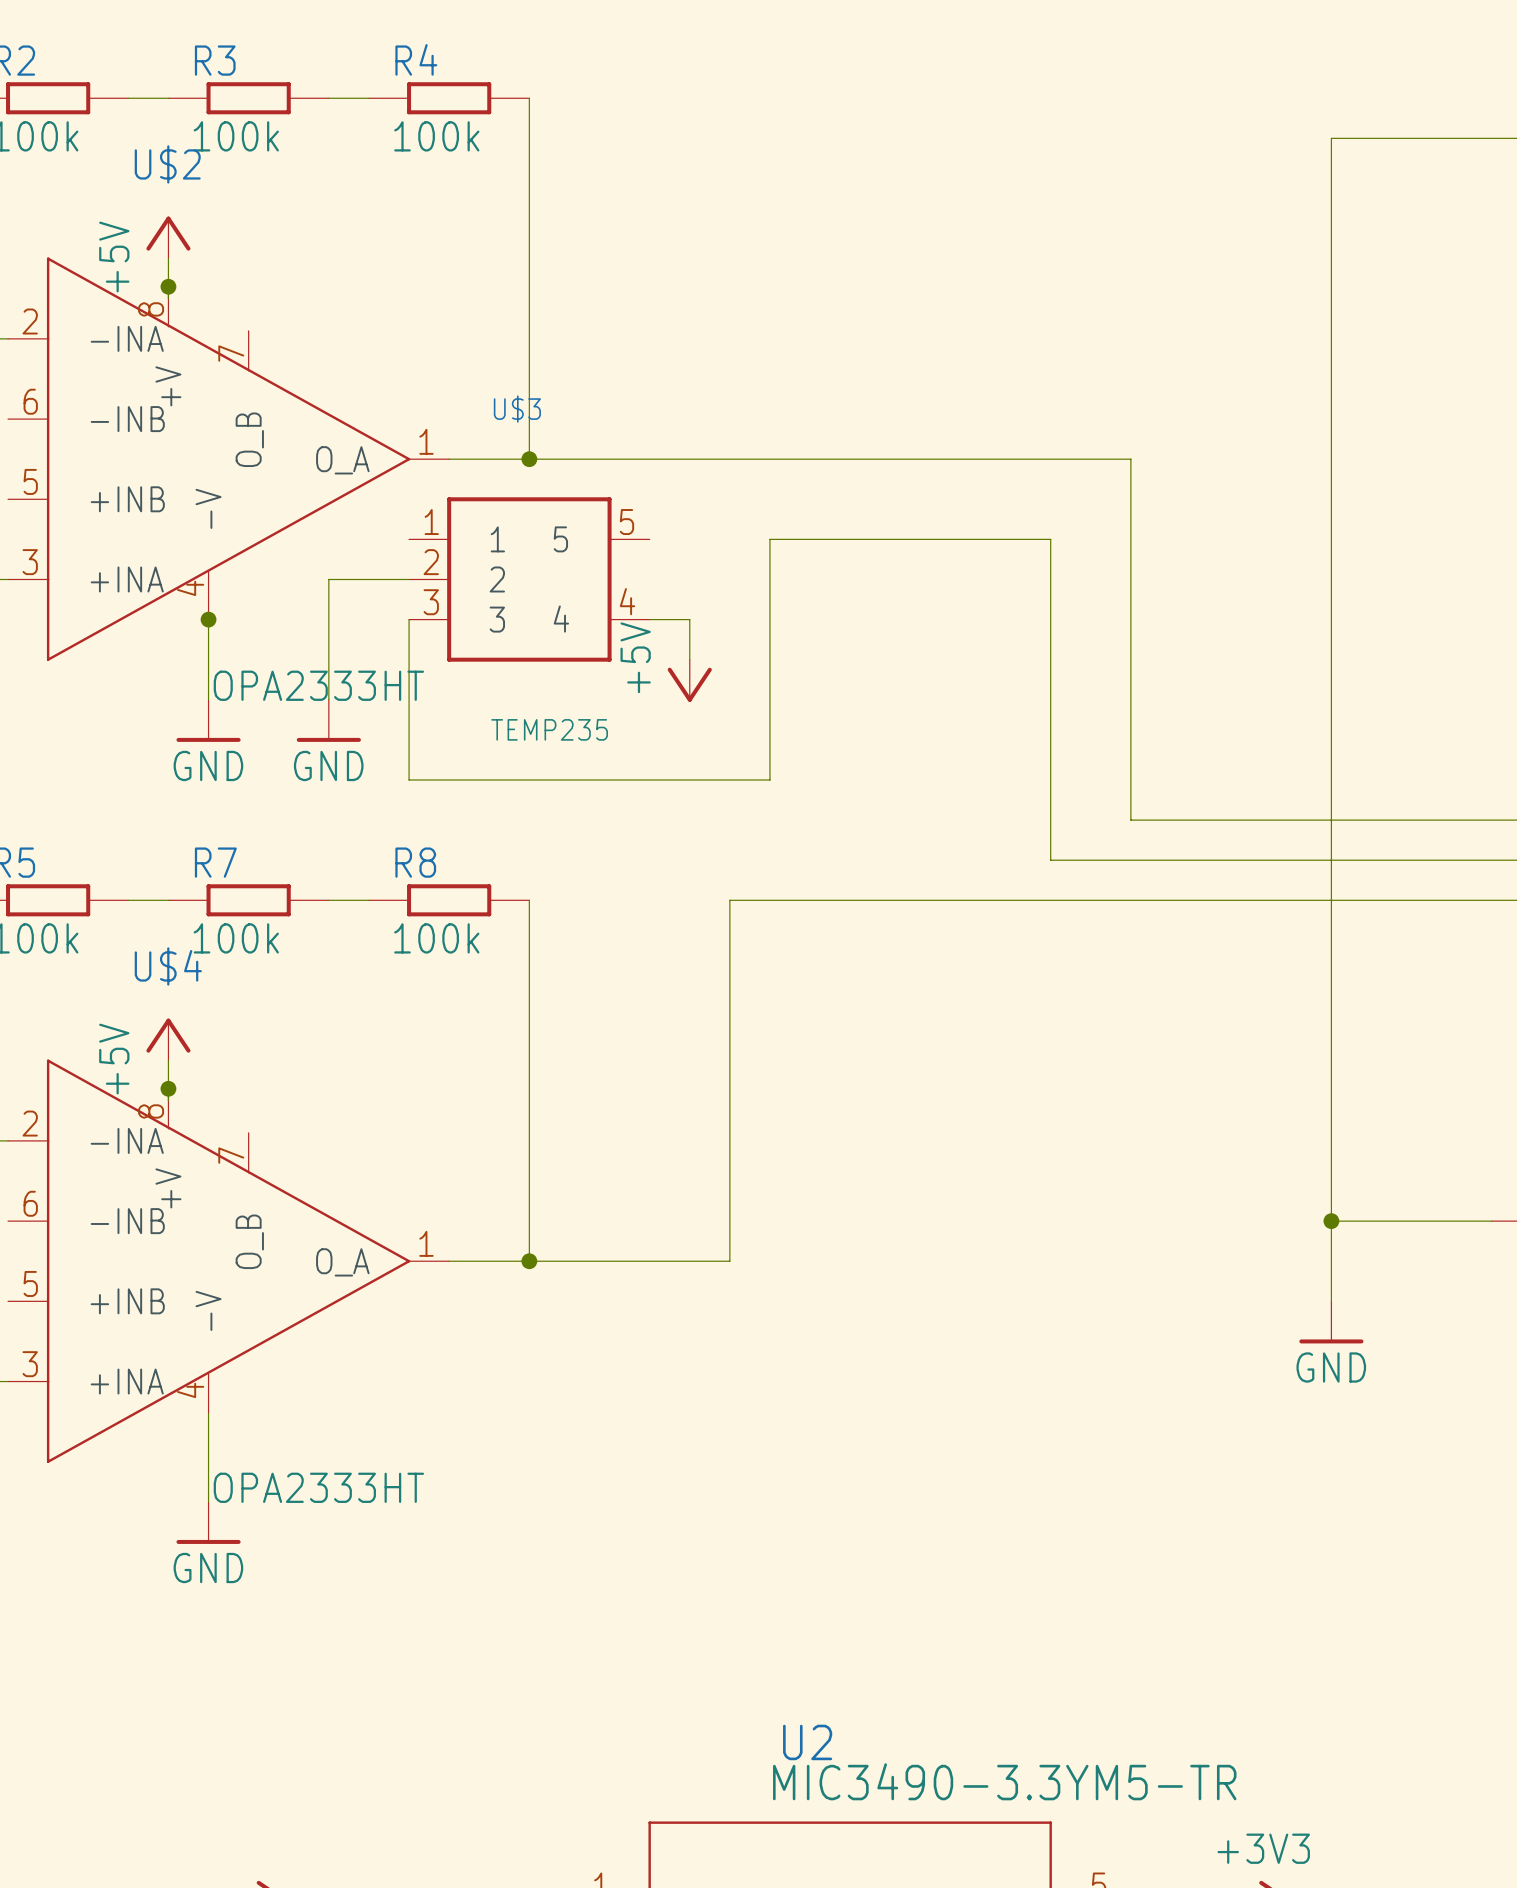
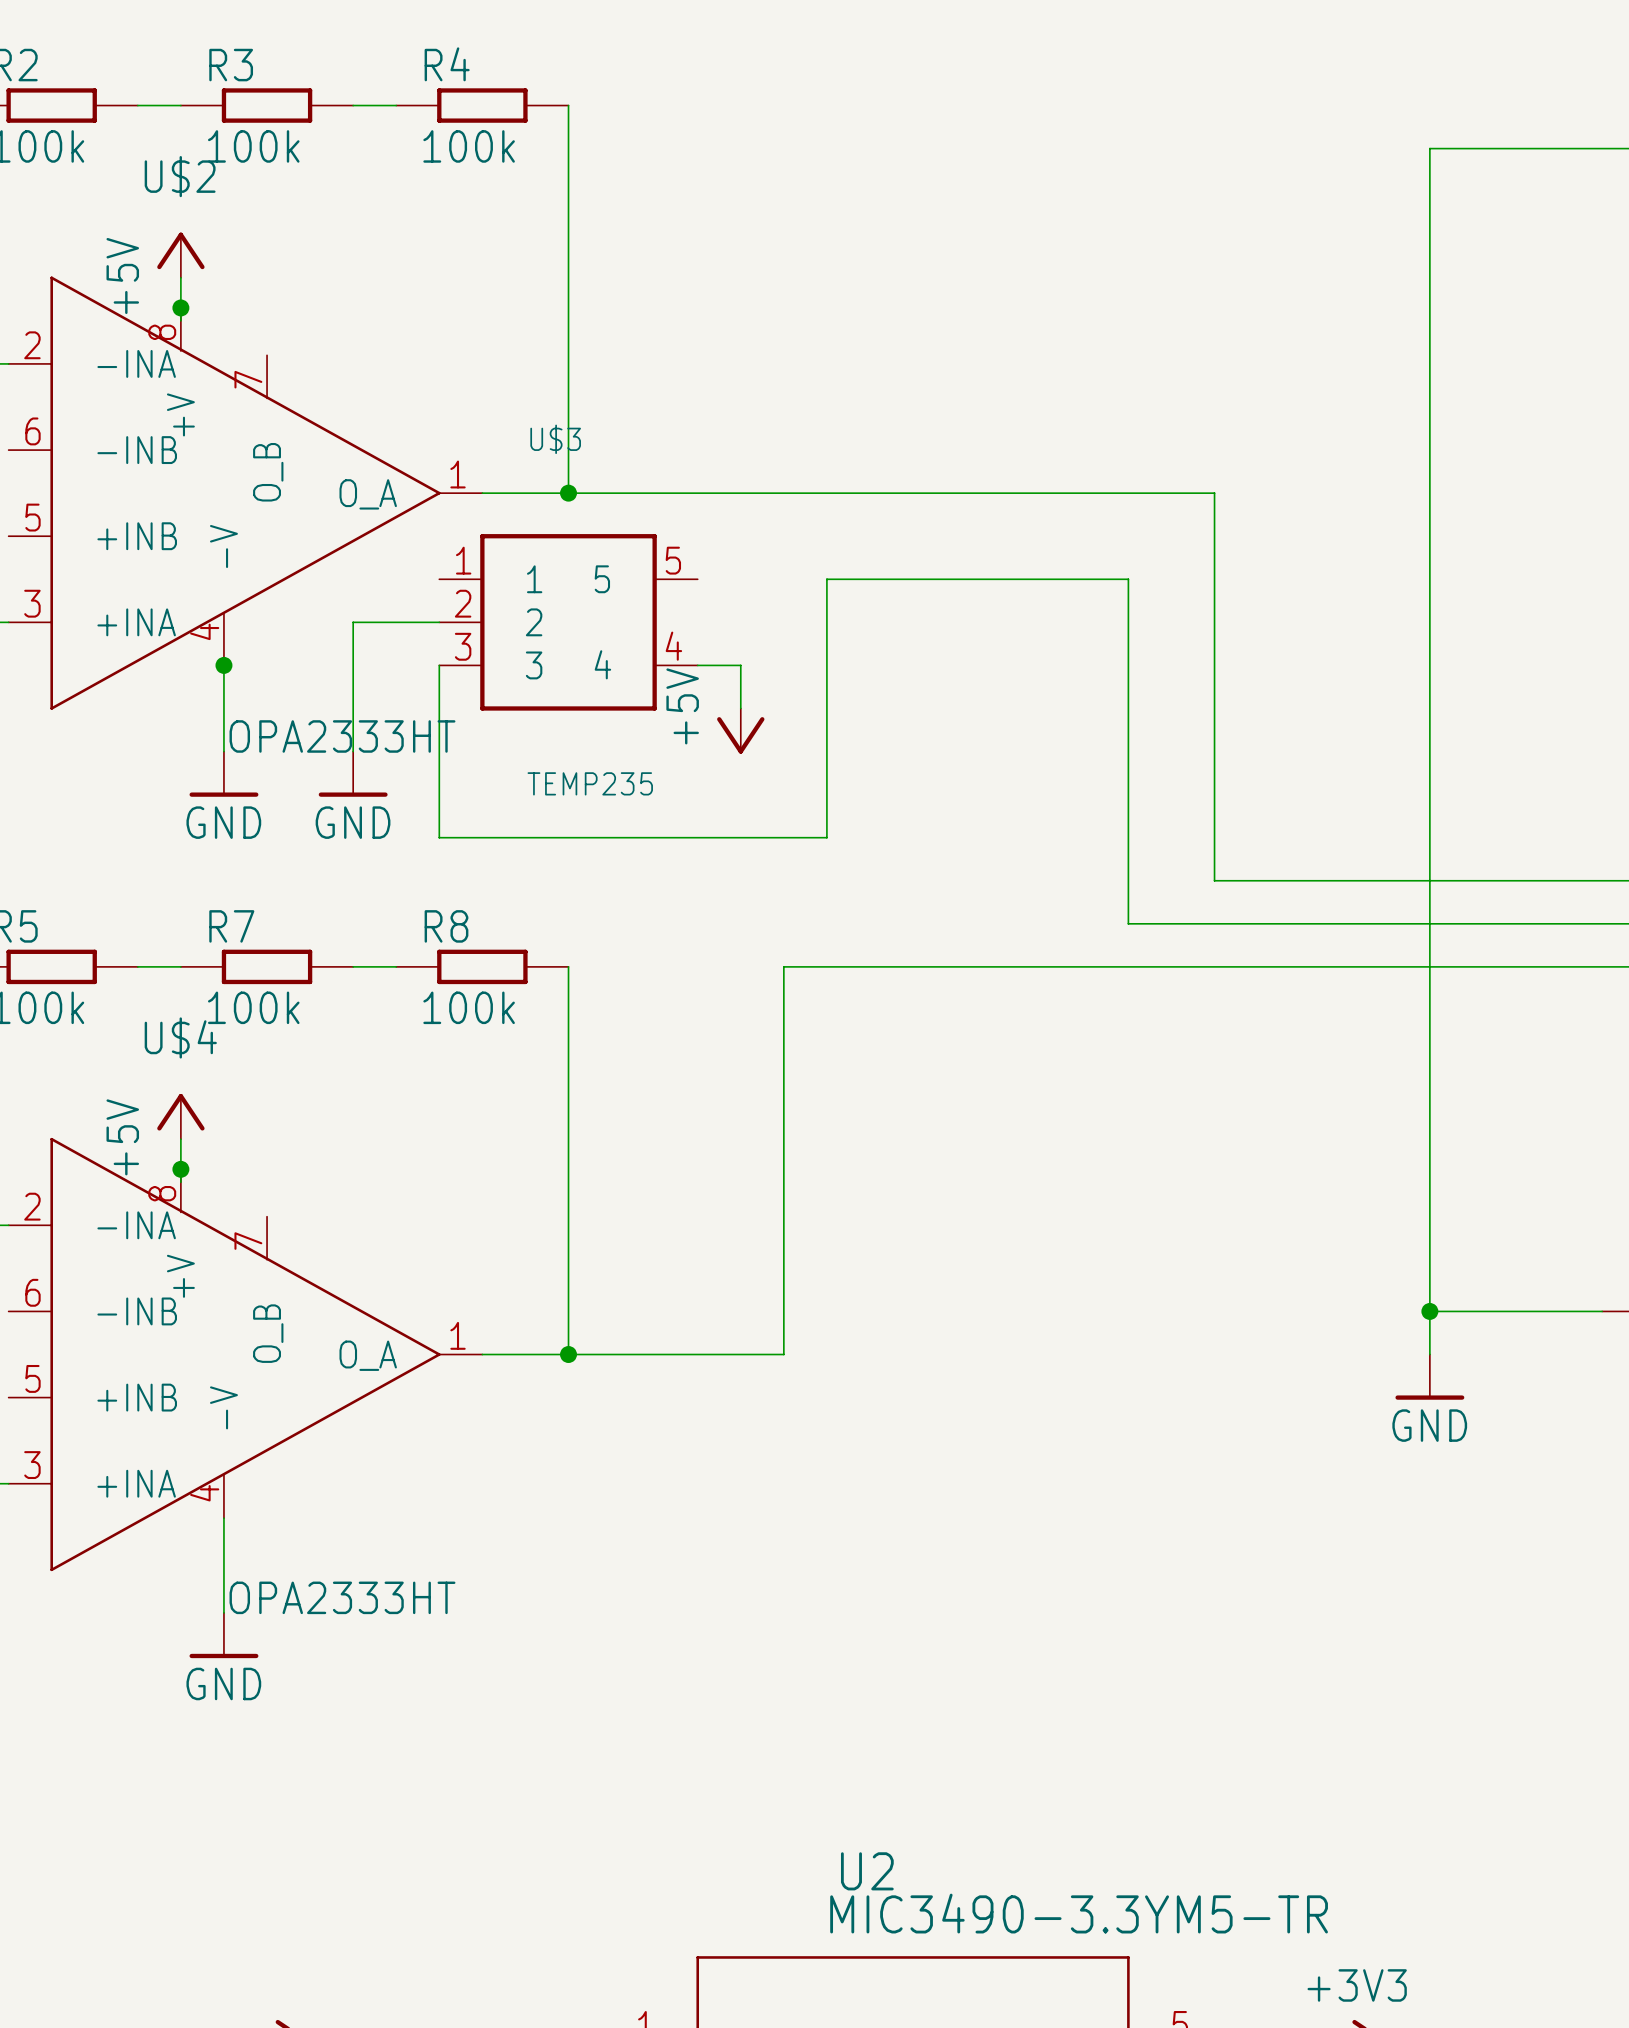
power symbol position: GND (1331, 1322) -> GND (1429, 1377)

